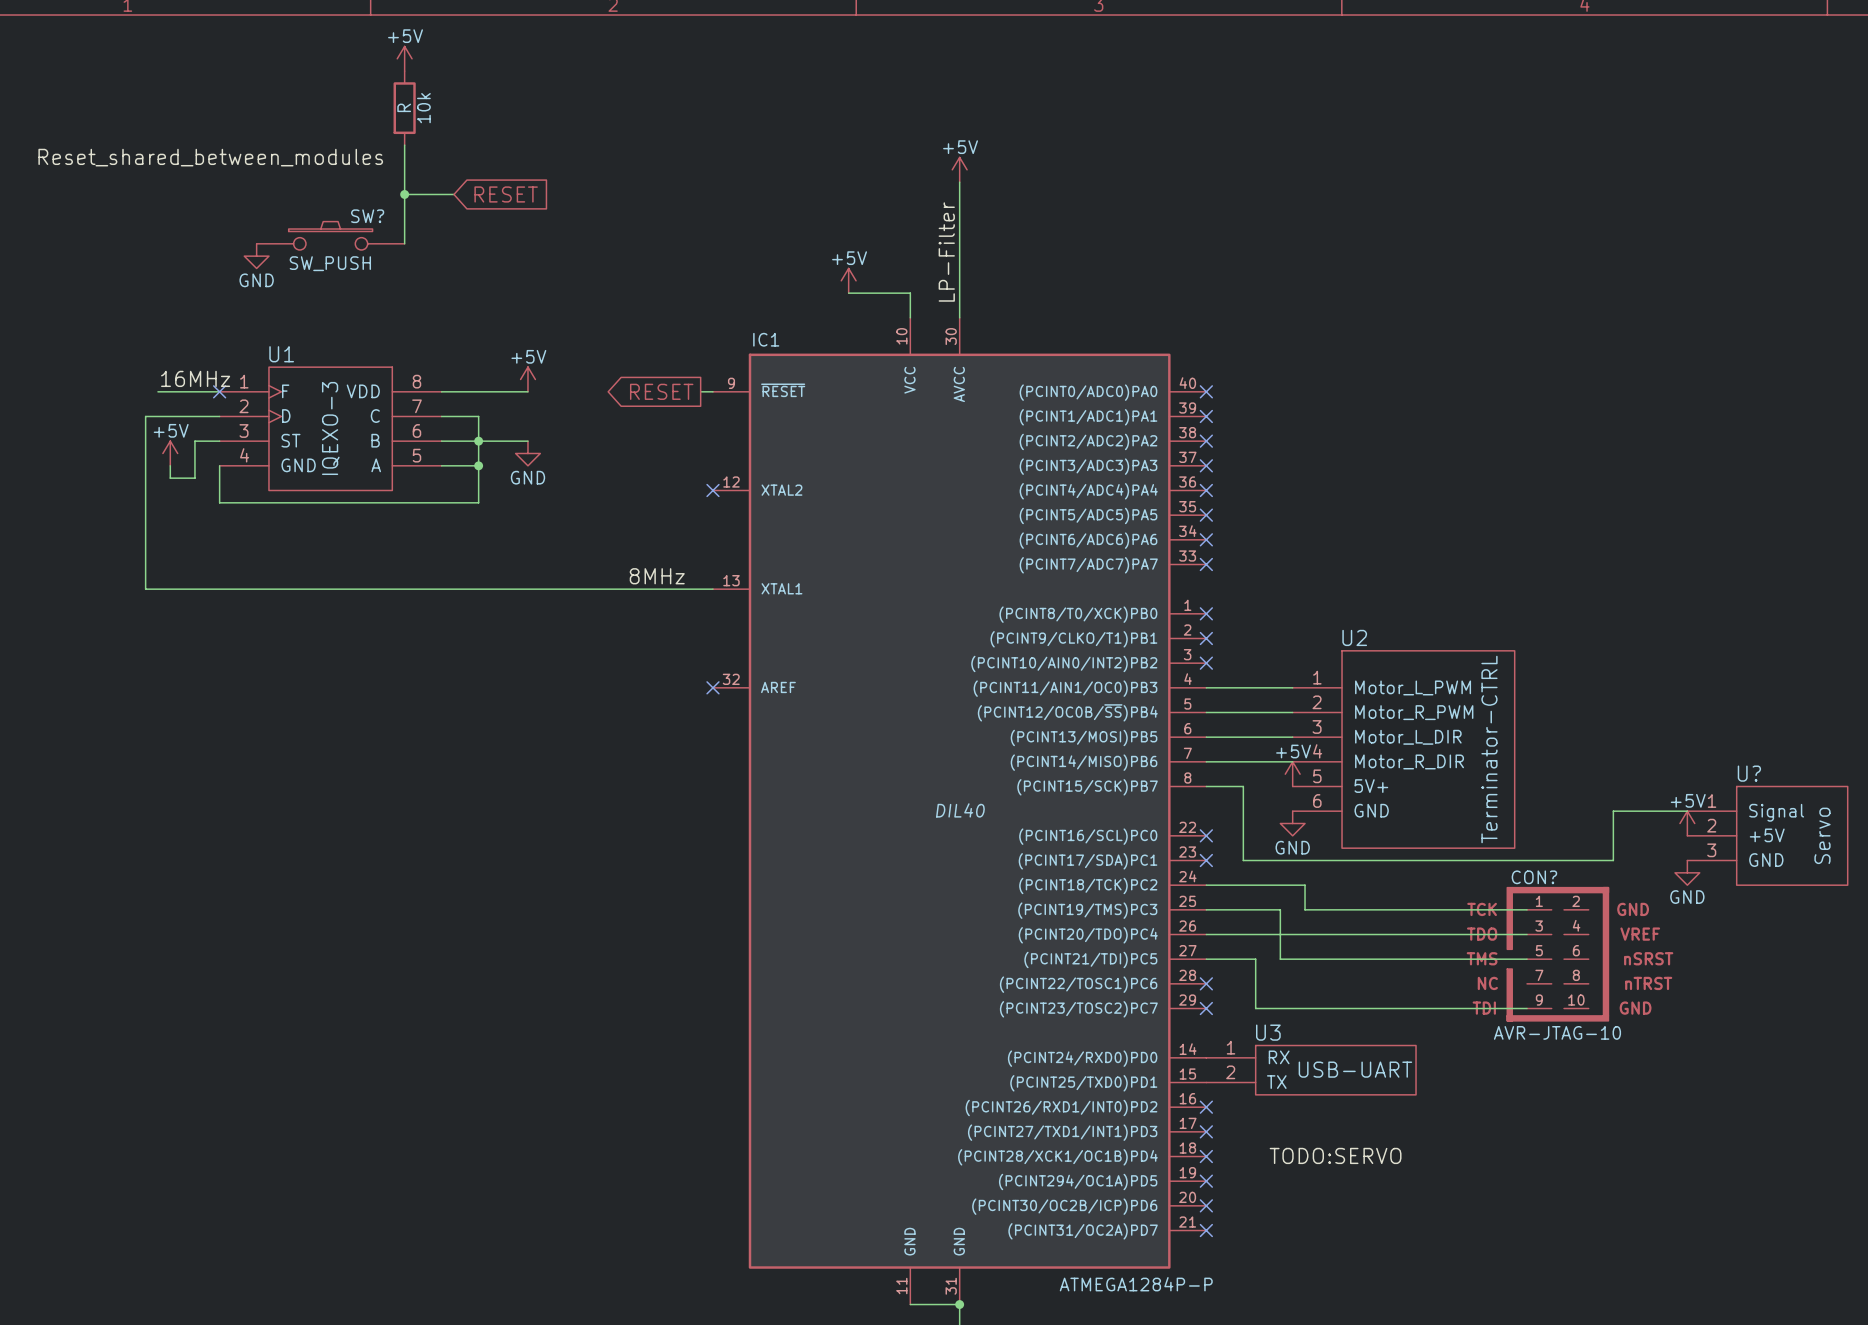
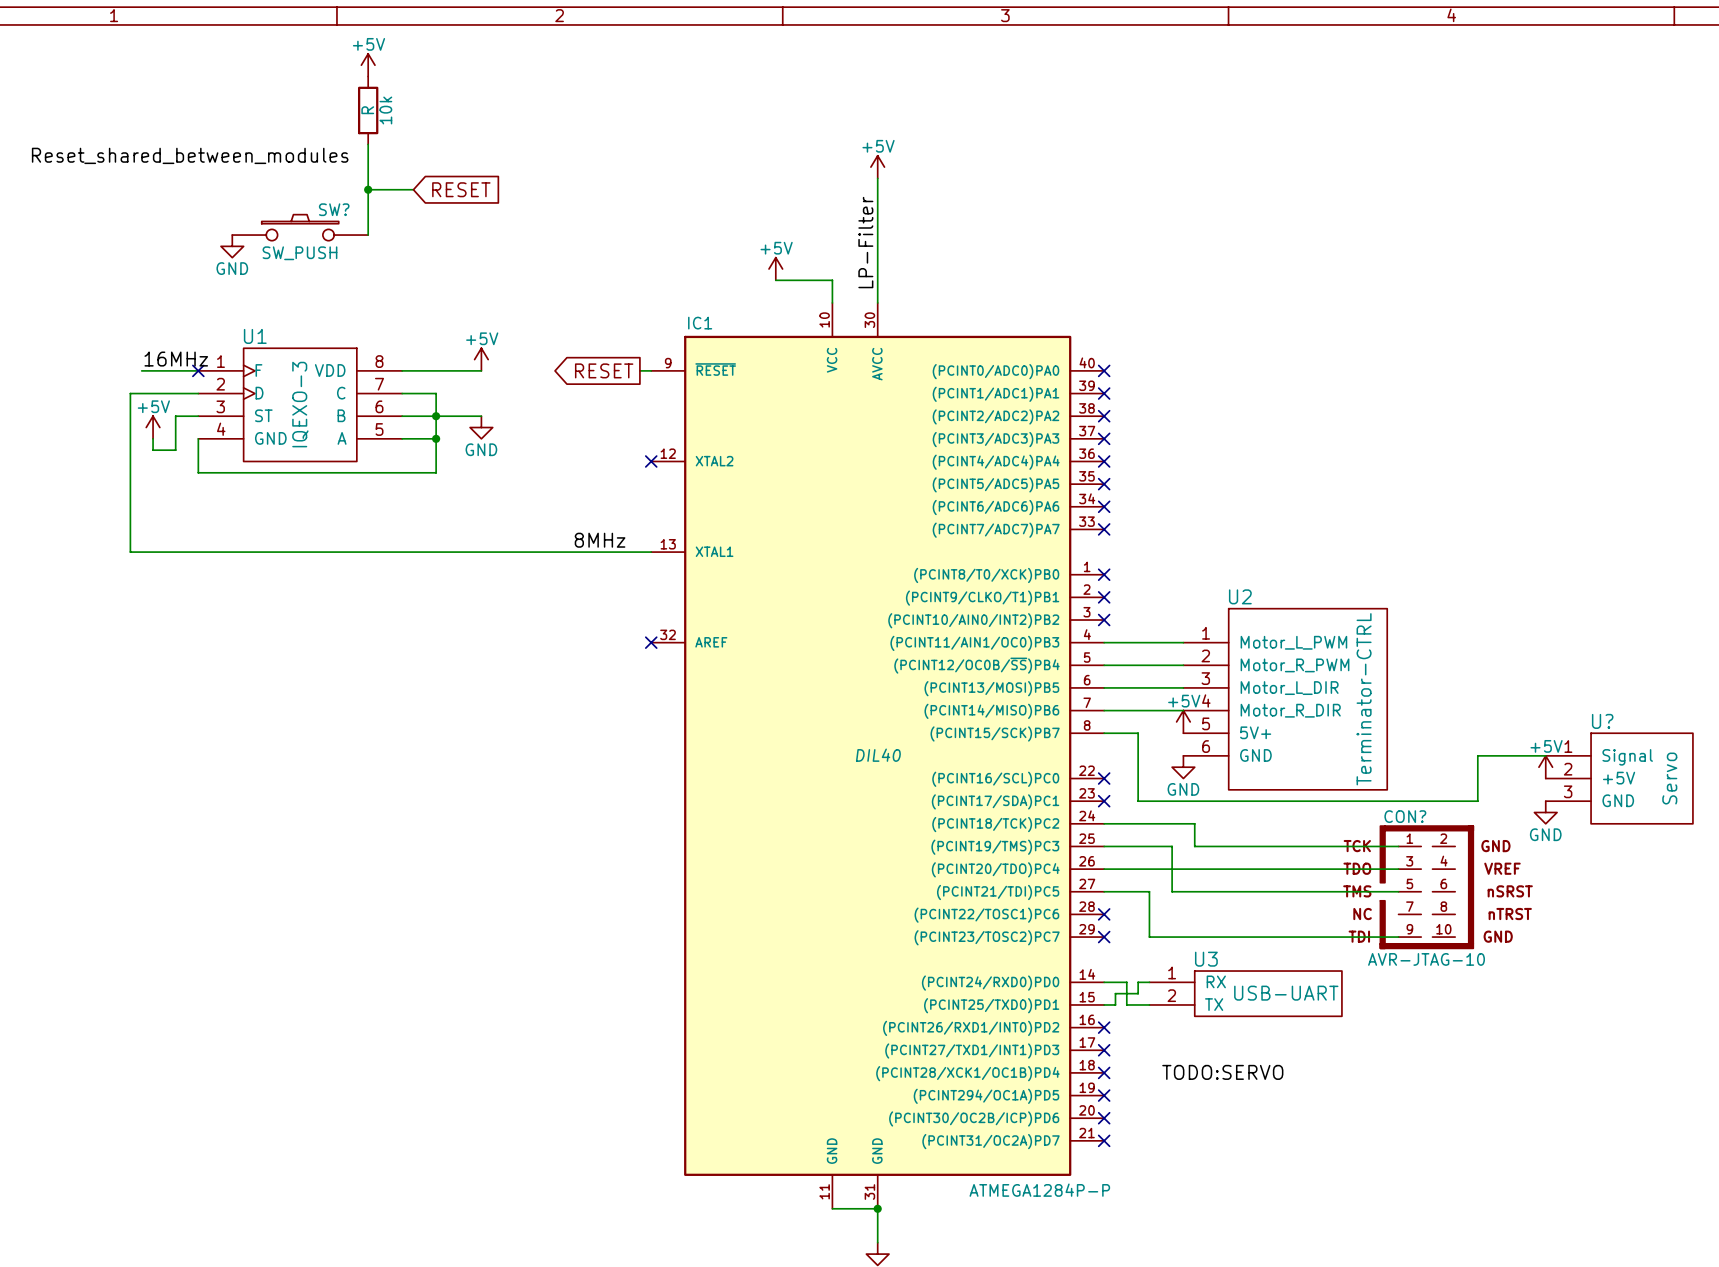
wire: none -> (1149, 982) (1138, 982) (1138, 993) (1115, 993) (1115, 1004) (1104, 1004)
U3 position: (1311, 1070) -> (1245, 993)

